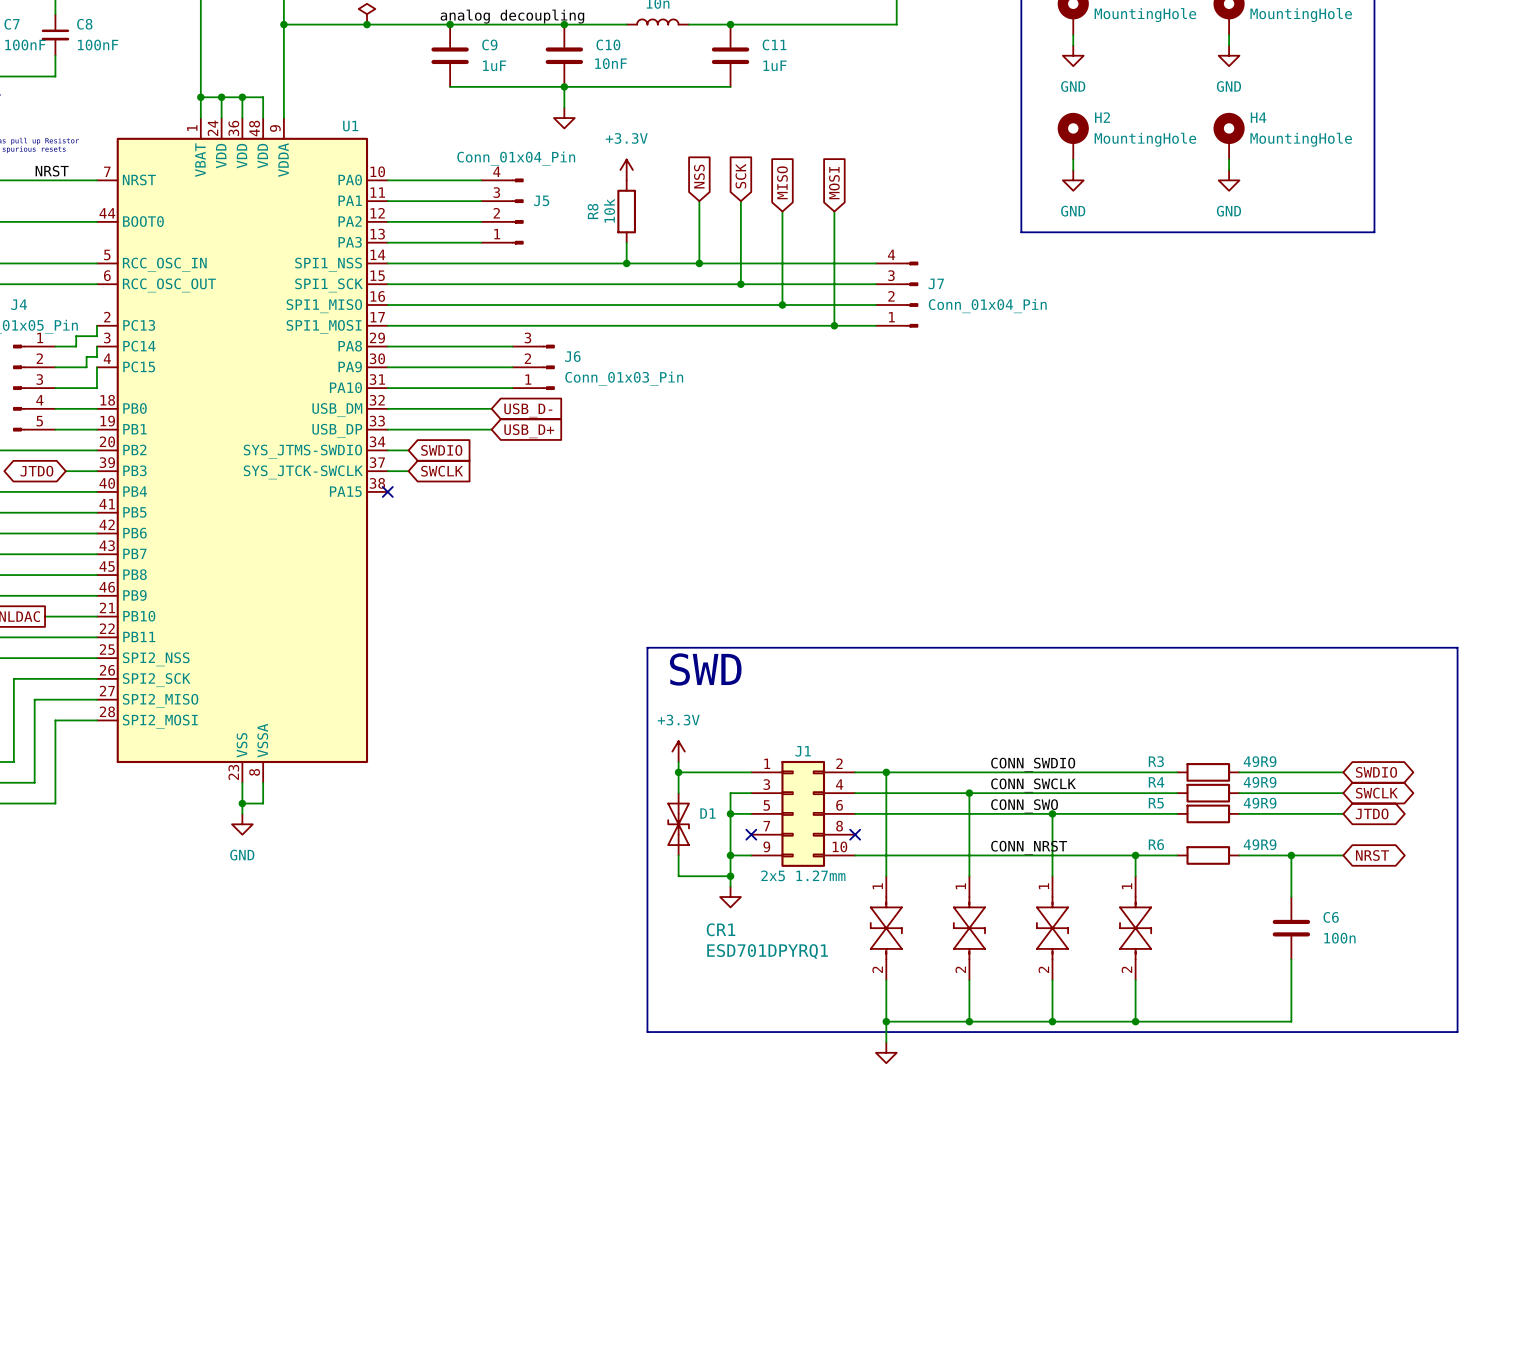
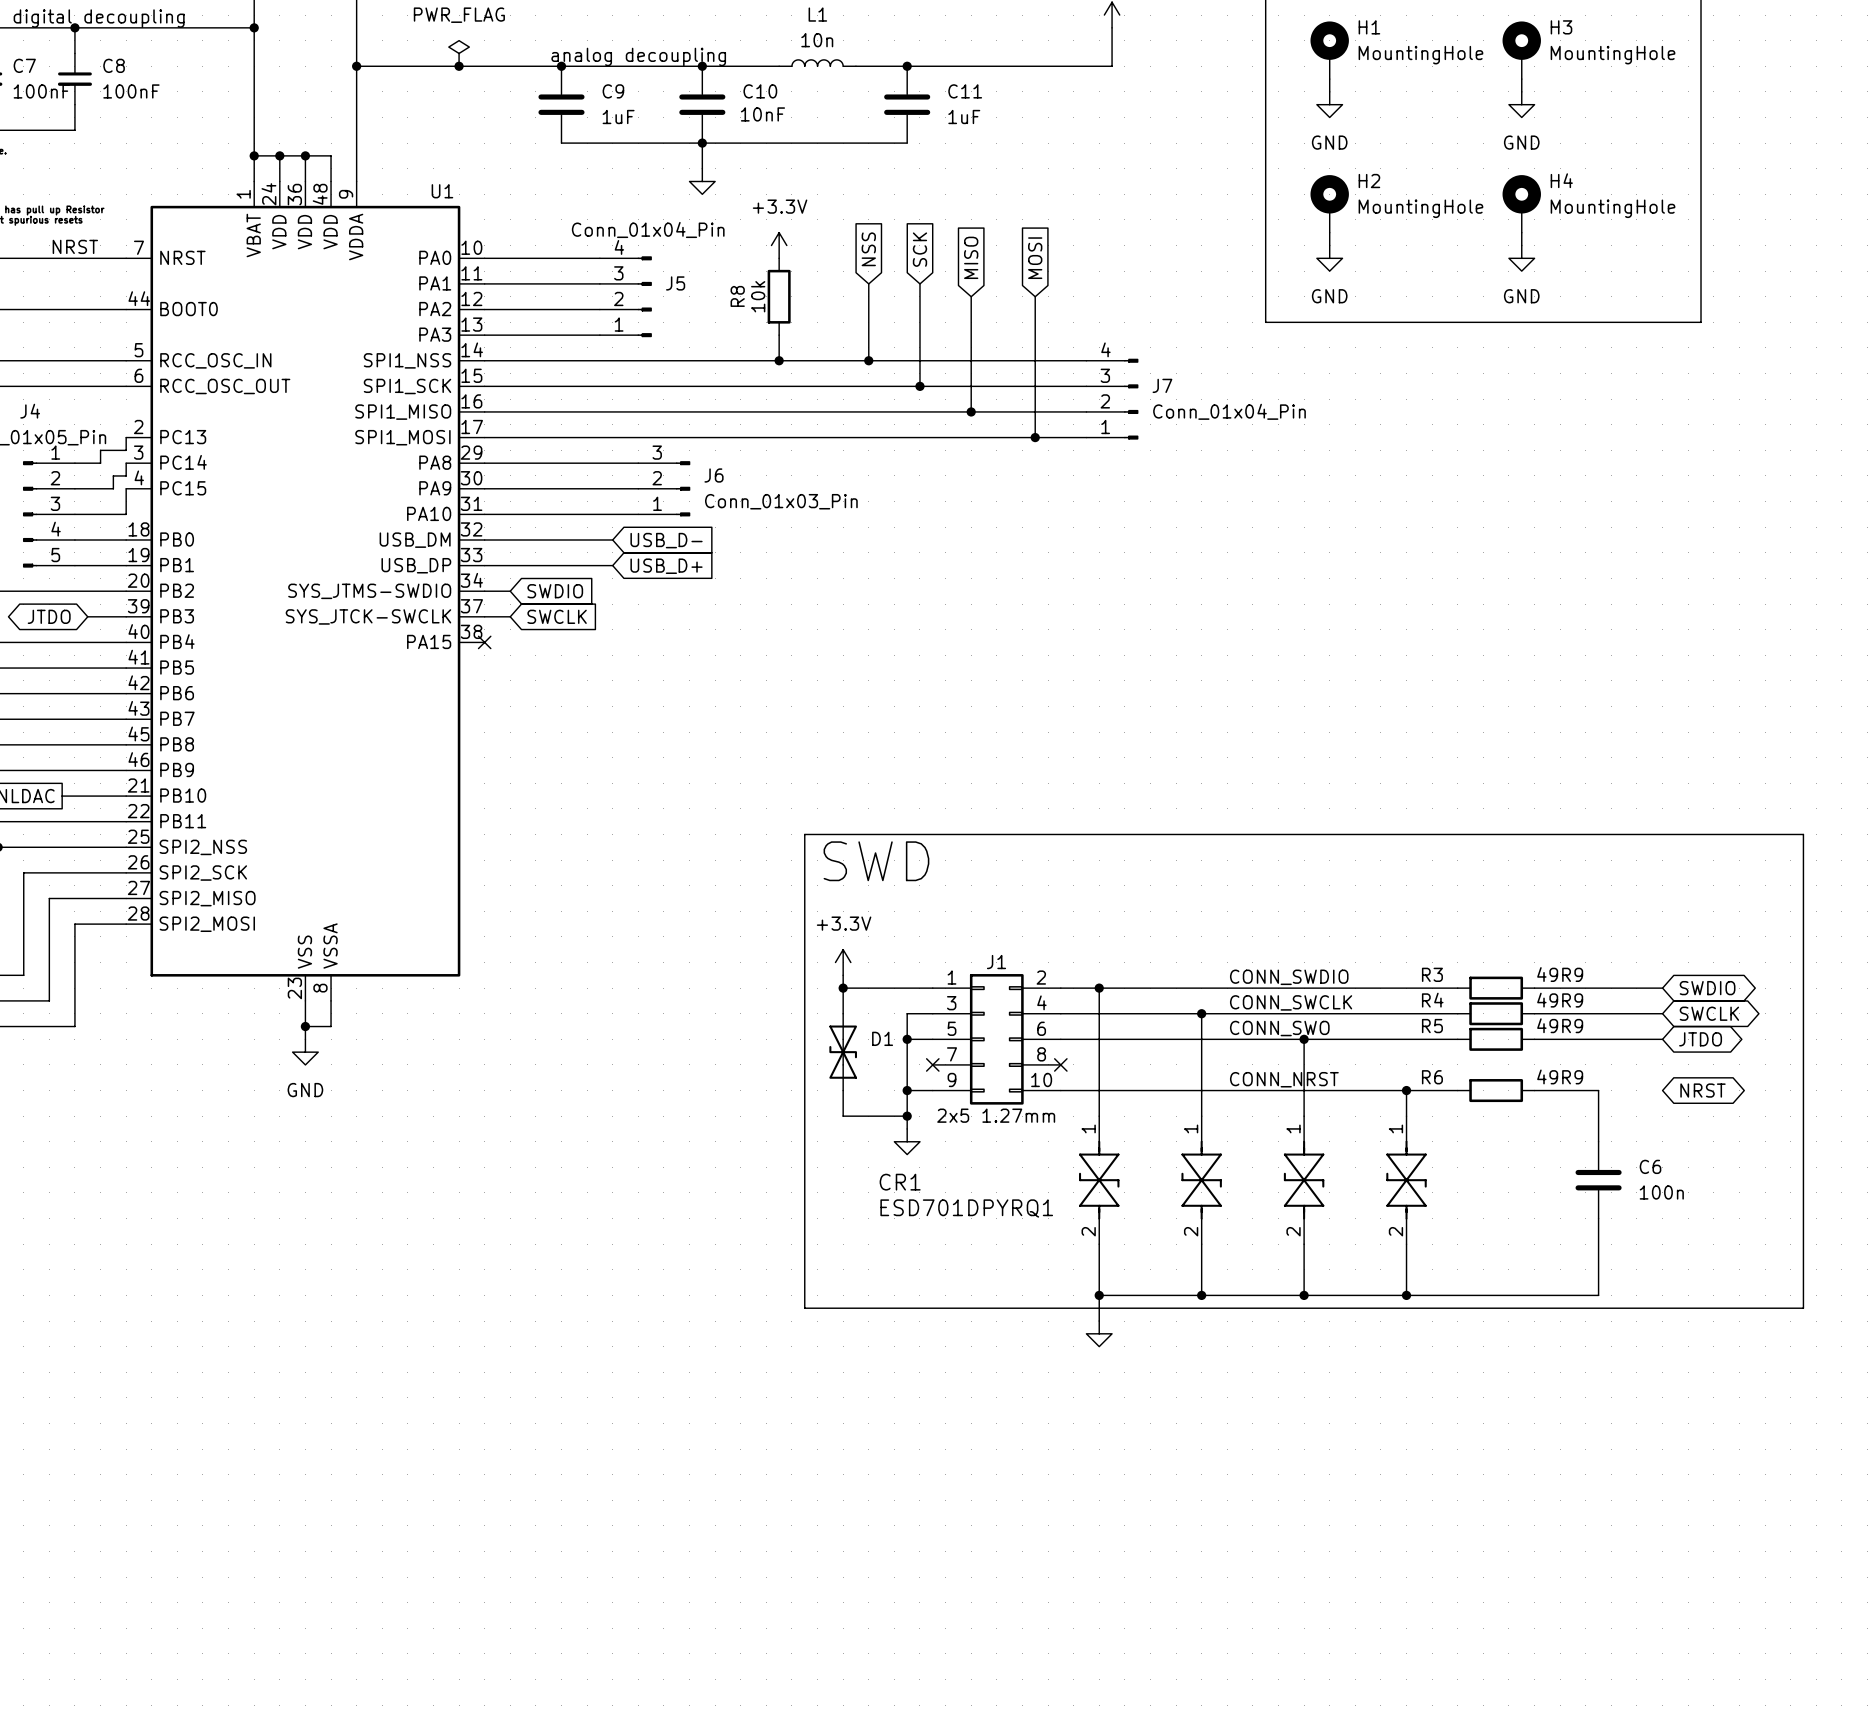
wire: (1291, 855) (1343, 855) -> none
junction: (1291, 855) -> none

